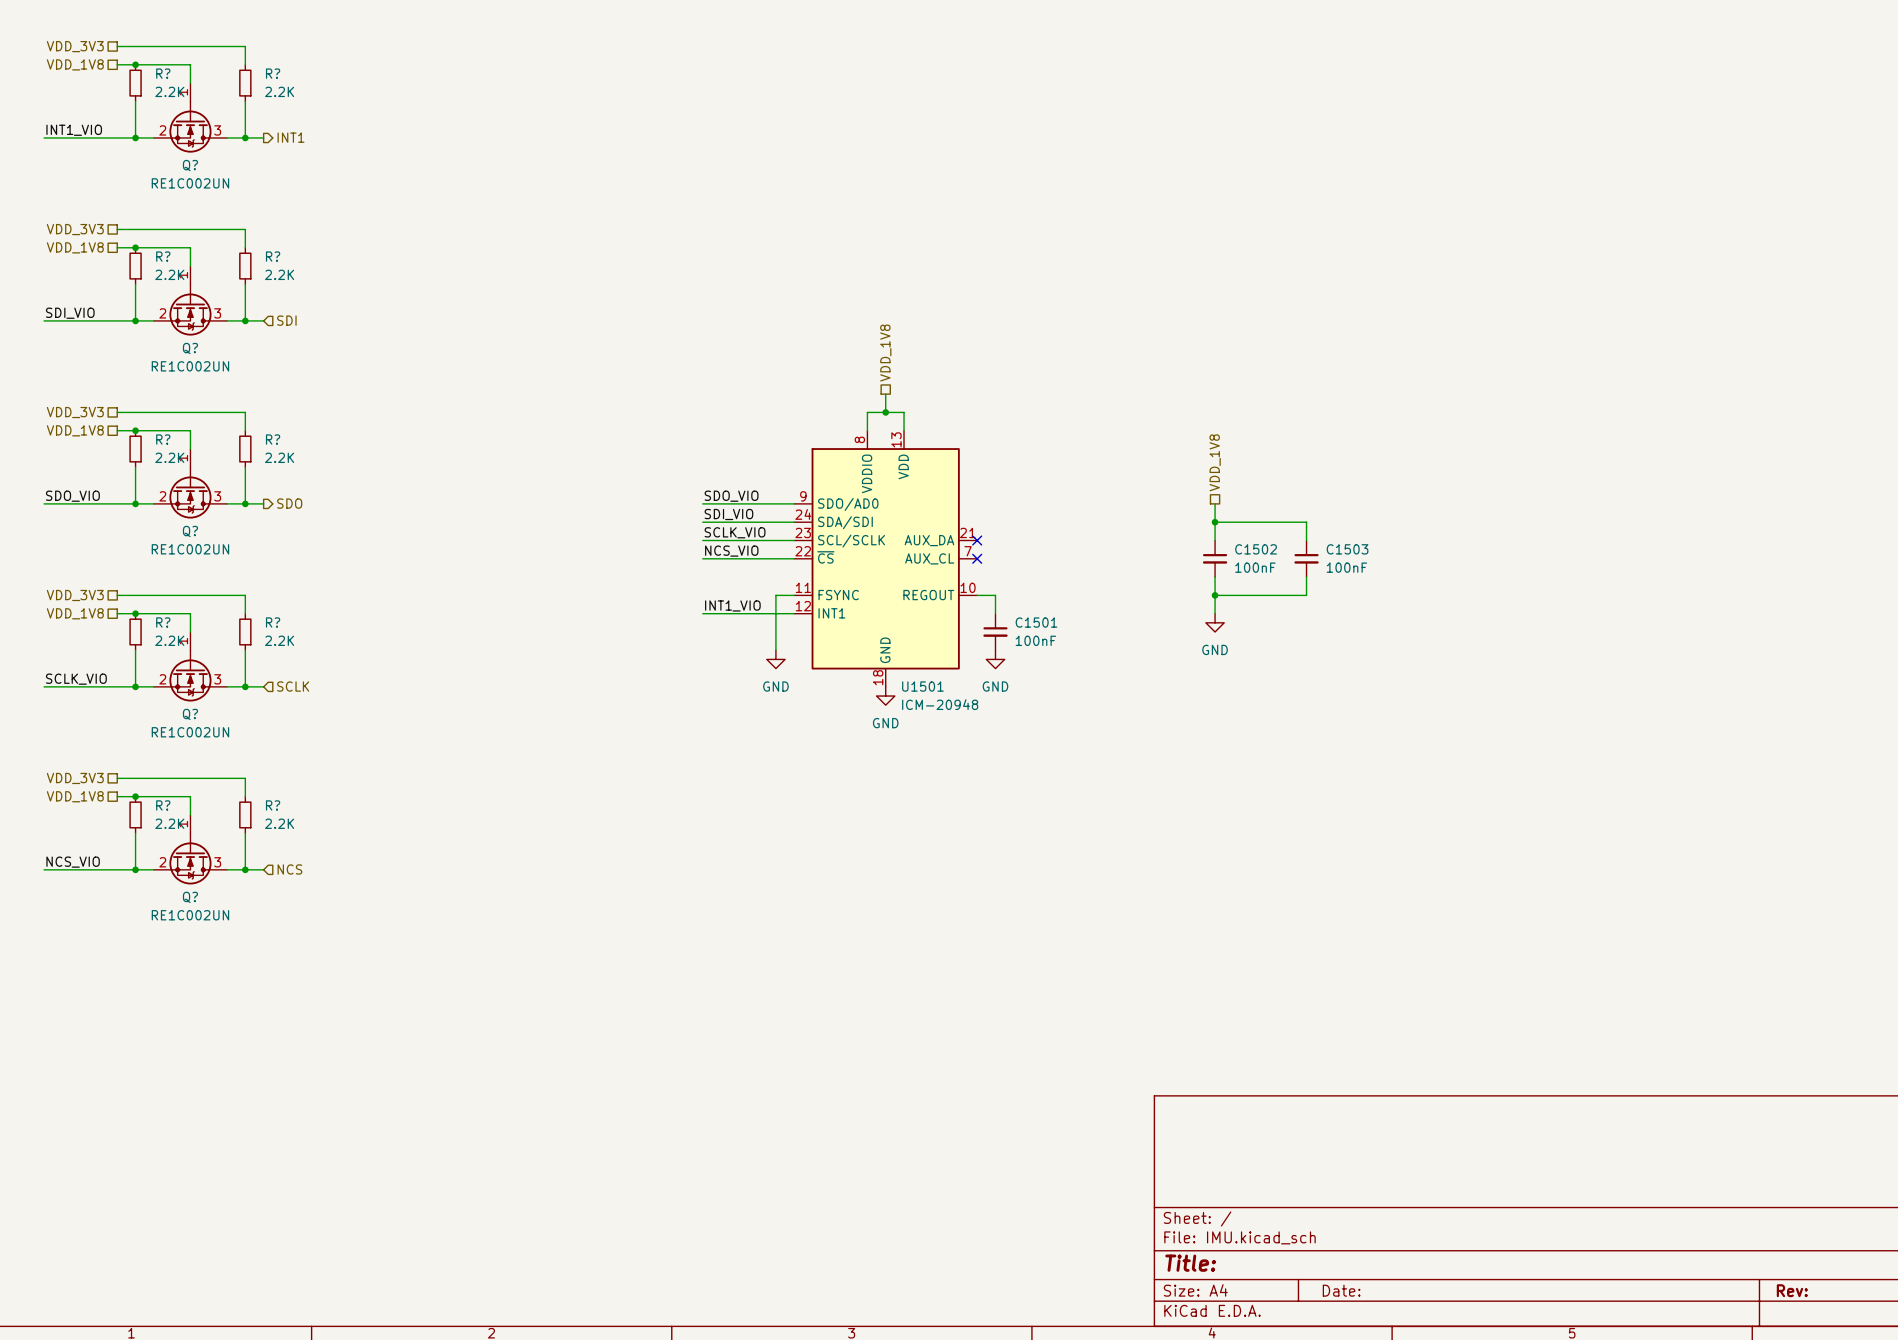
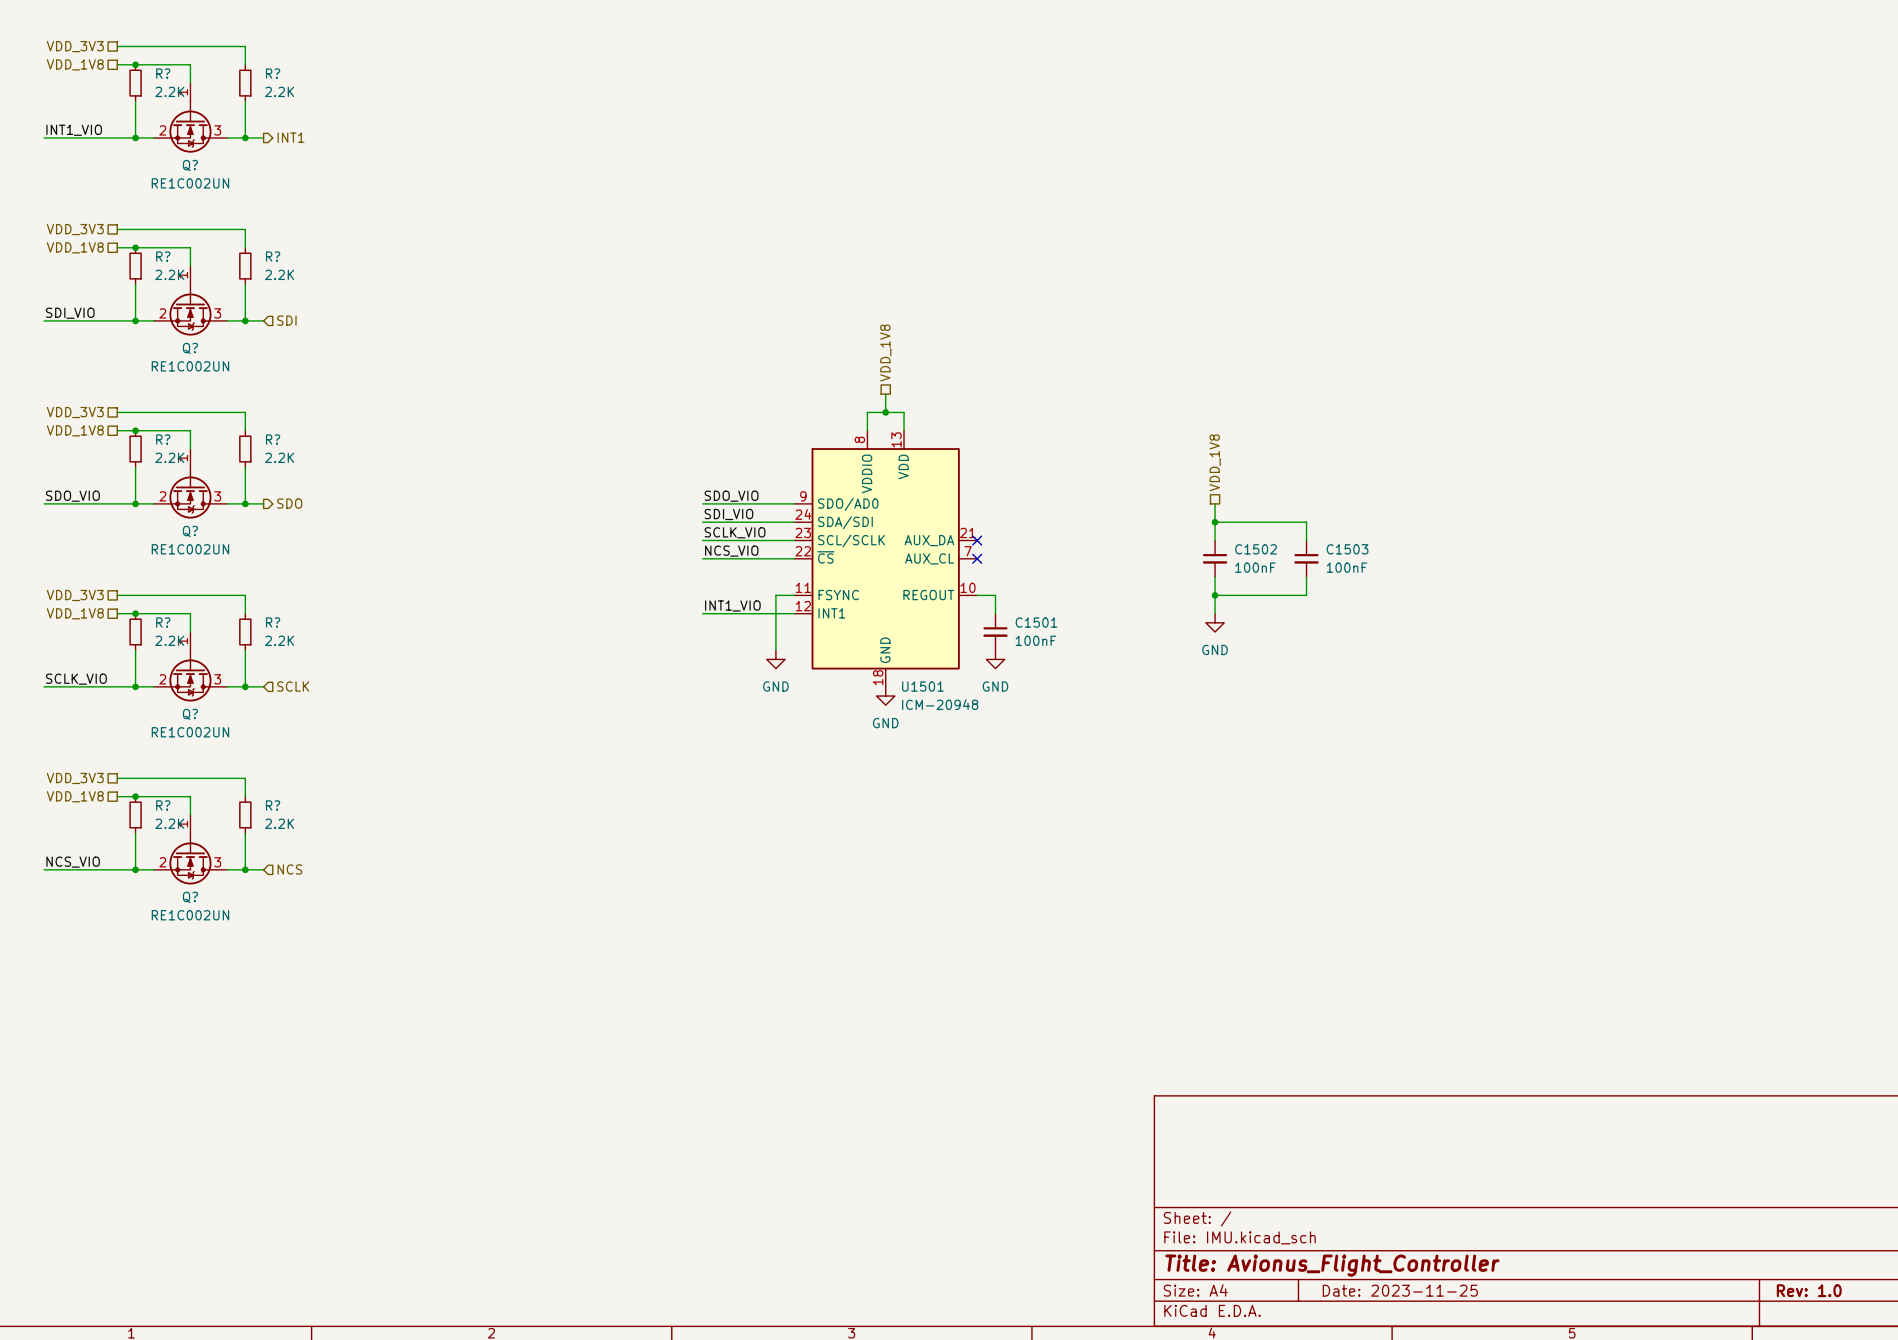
title block: Title: (1190, 1263) -> Title: Avionus_Flight_Controller (1332, 1265)
title block: Date: (1341, 1290) -> Date: 2023-11-25 (1400, 1290)
title block: Rev: (1792, 1290) -> Rev: 1.0 (1809, 1290)

